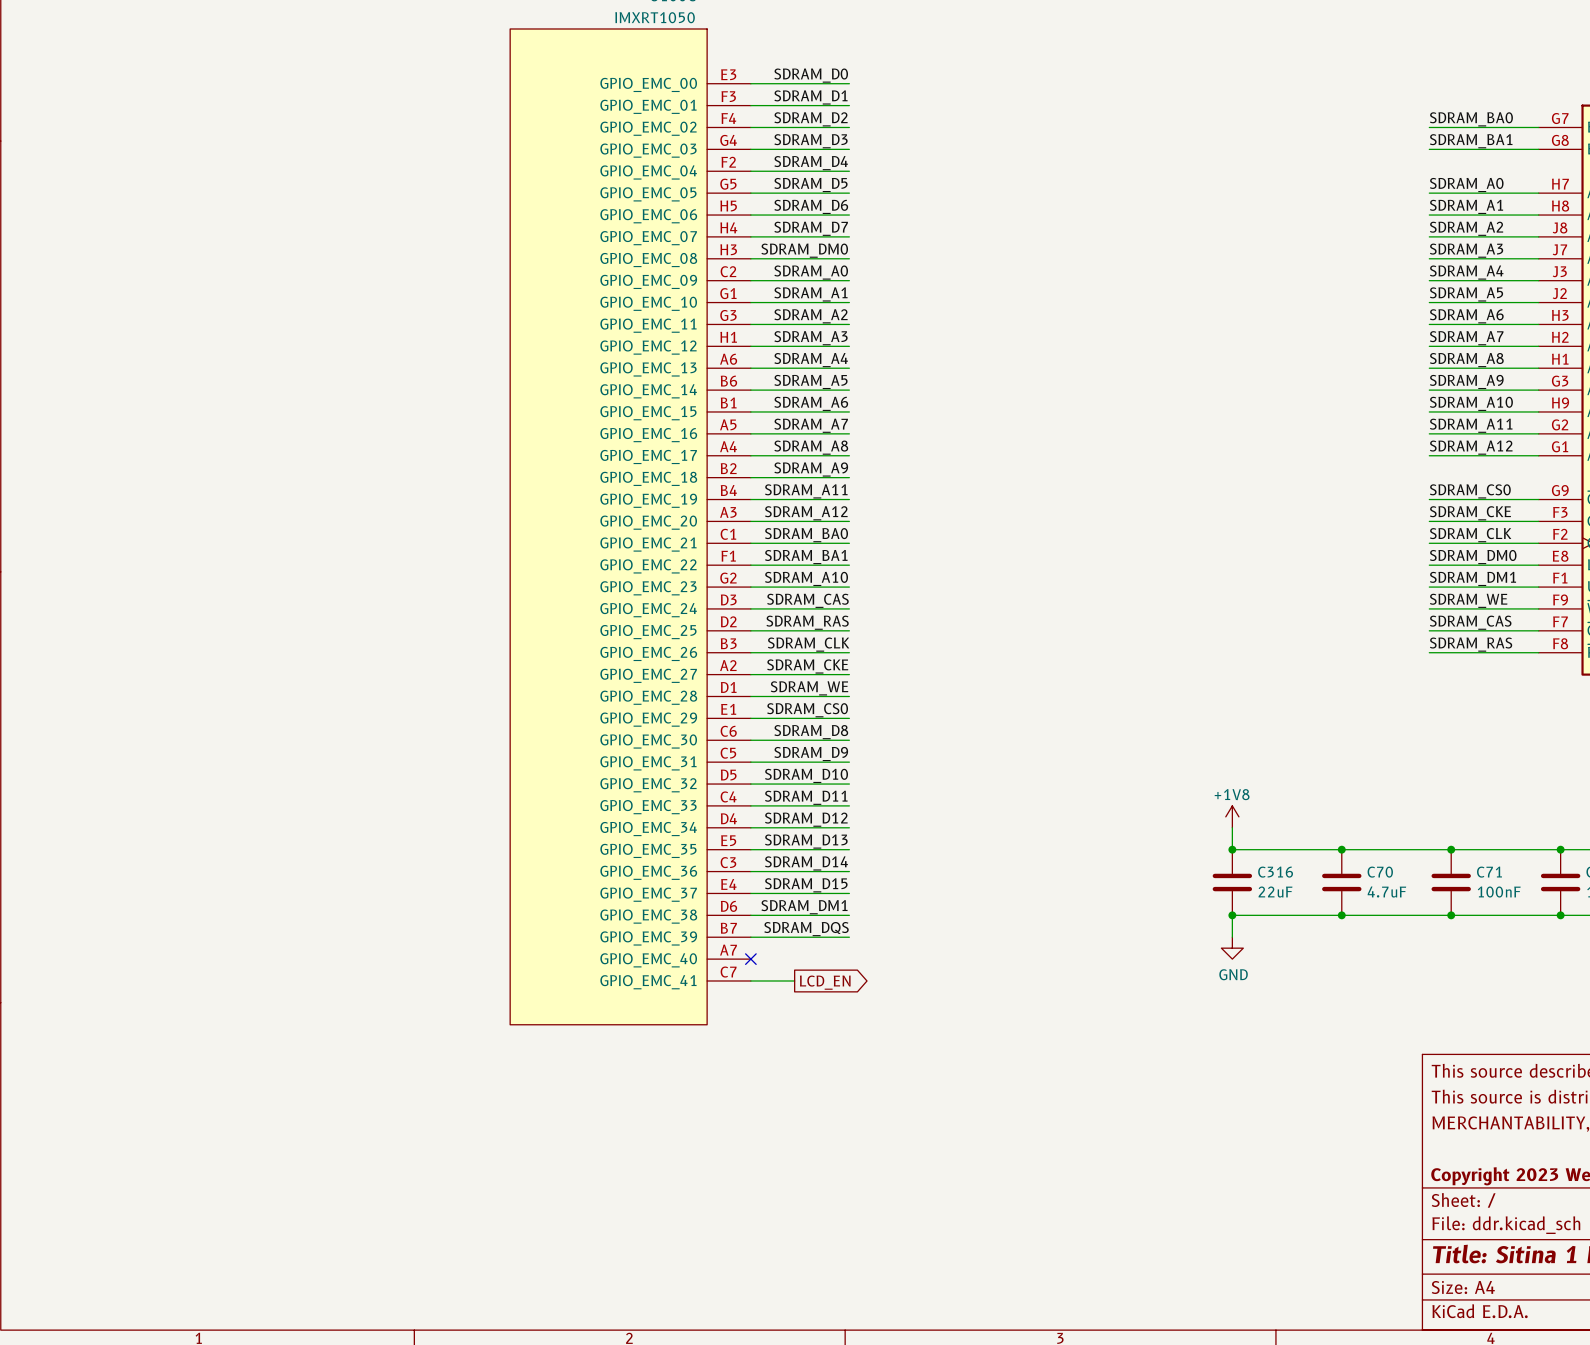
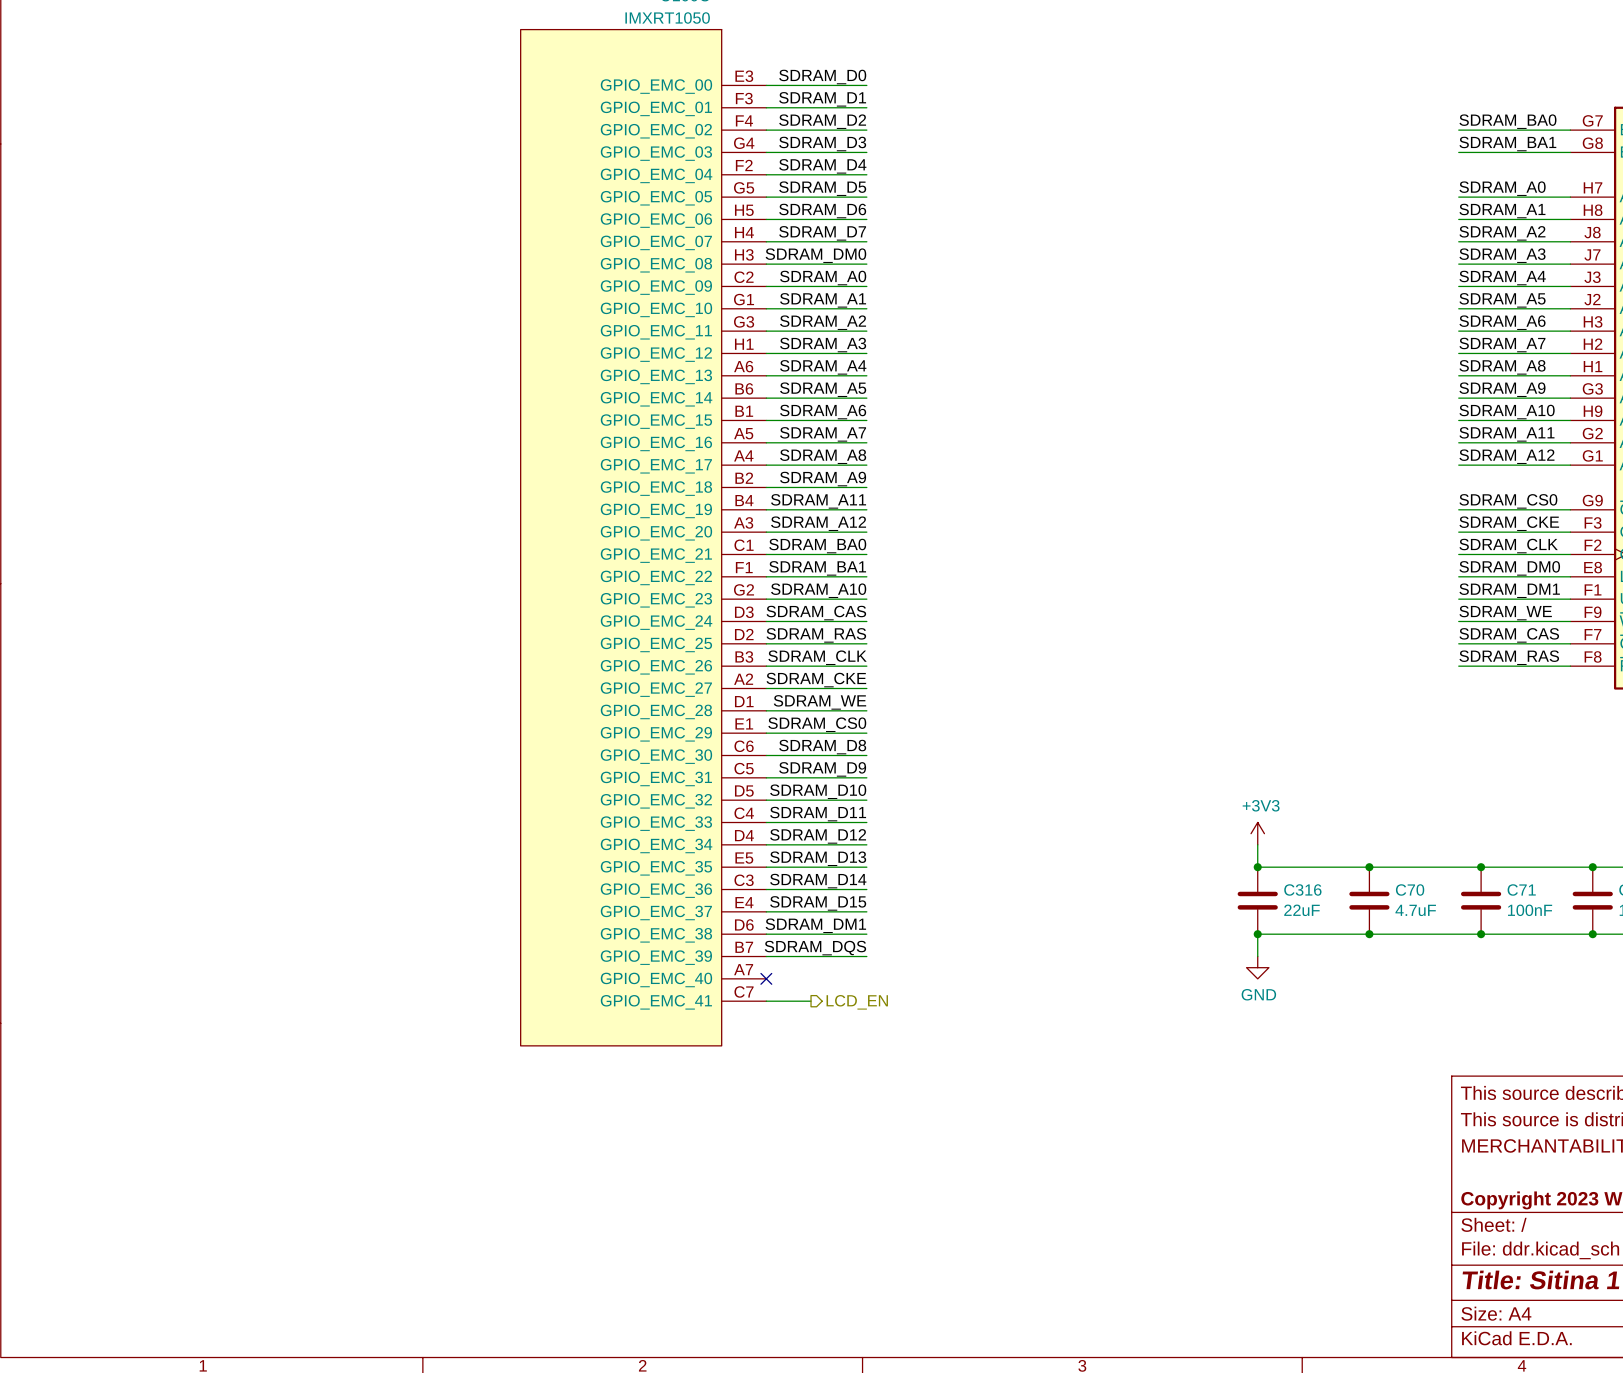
power symbol: +1V8 (1232, 816) -> +3V3 (1257, 833)
global label: LCD_EN (825, 982) -> none
hierarchical label: none -> LCD_EN (857, 1002)

